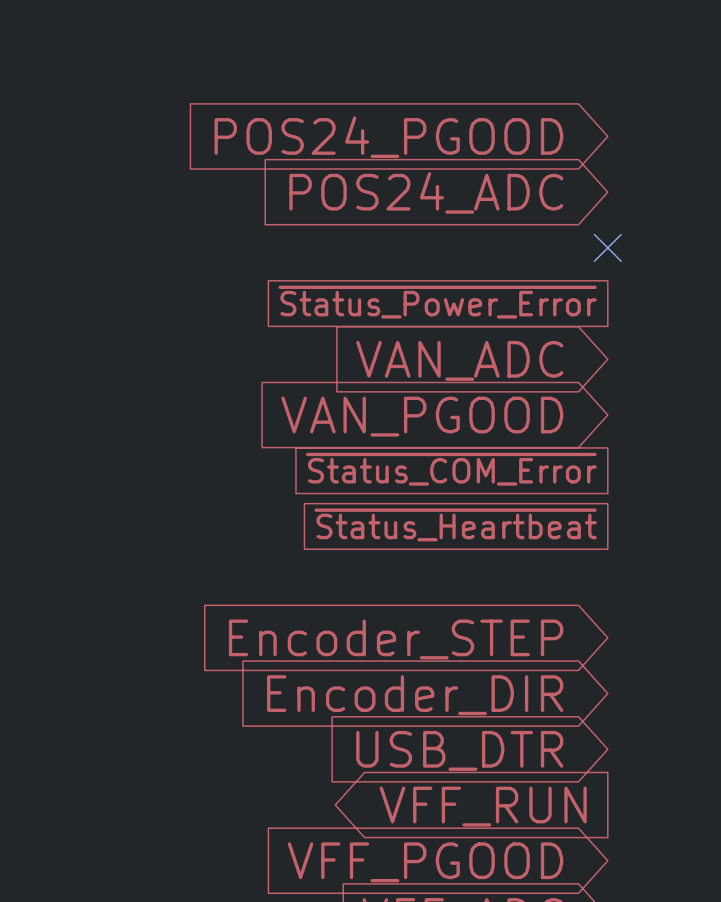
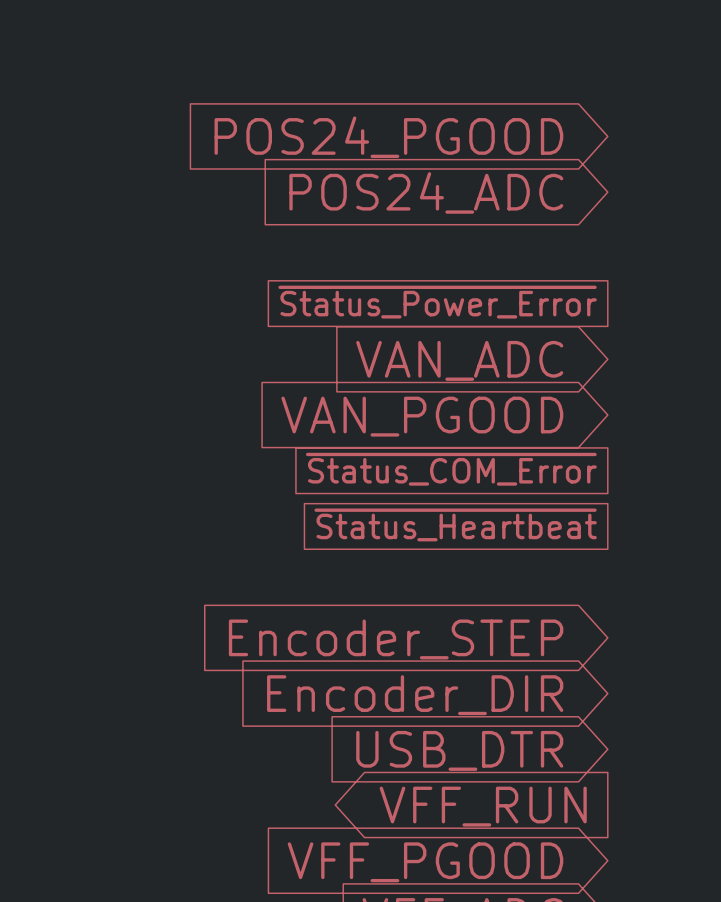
no-connect mark: (607, 247) -> none

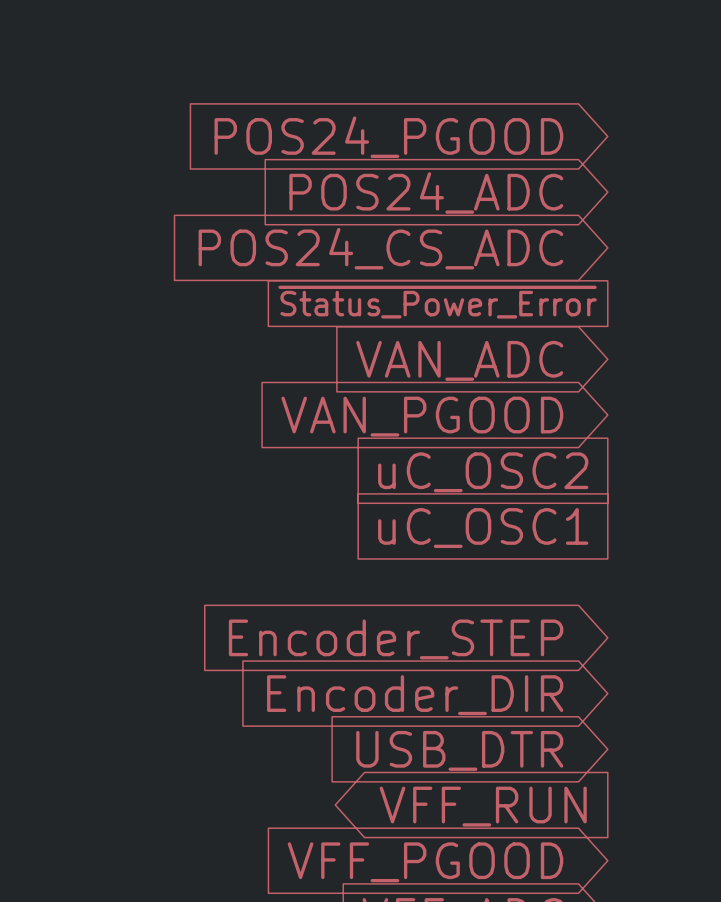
global label: none -> POS24_CS_ADC (380, 248)
global label: ~{Status_COM_Error} (451, 469) -> uC_OSC2 (483, 472)
global label: ~{Status_Heartbeat} (455, 524) -> uC_OSC1 (483, 528)

